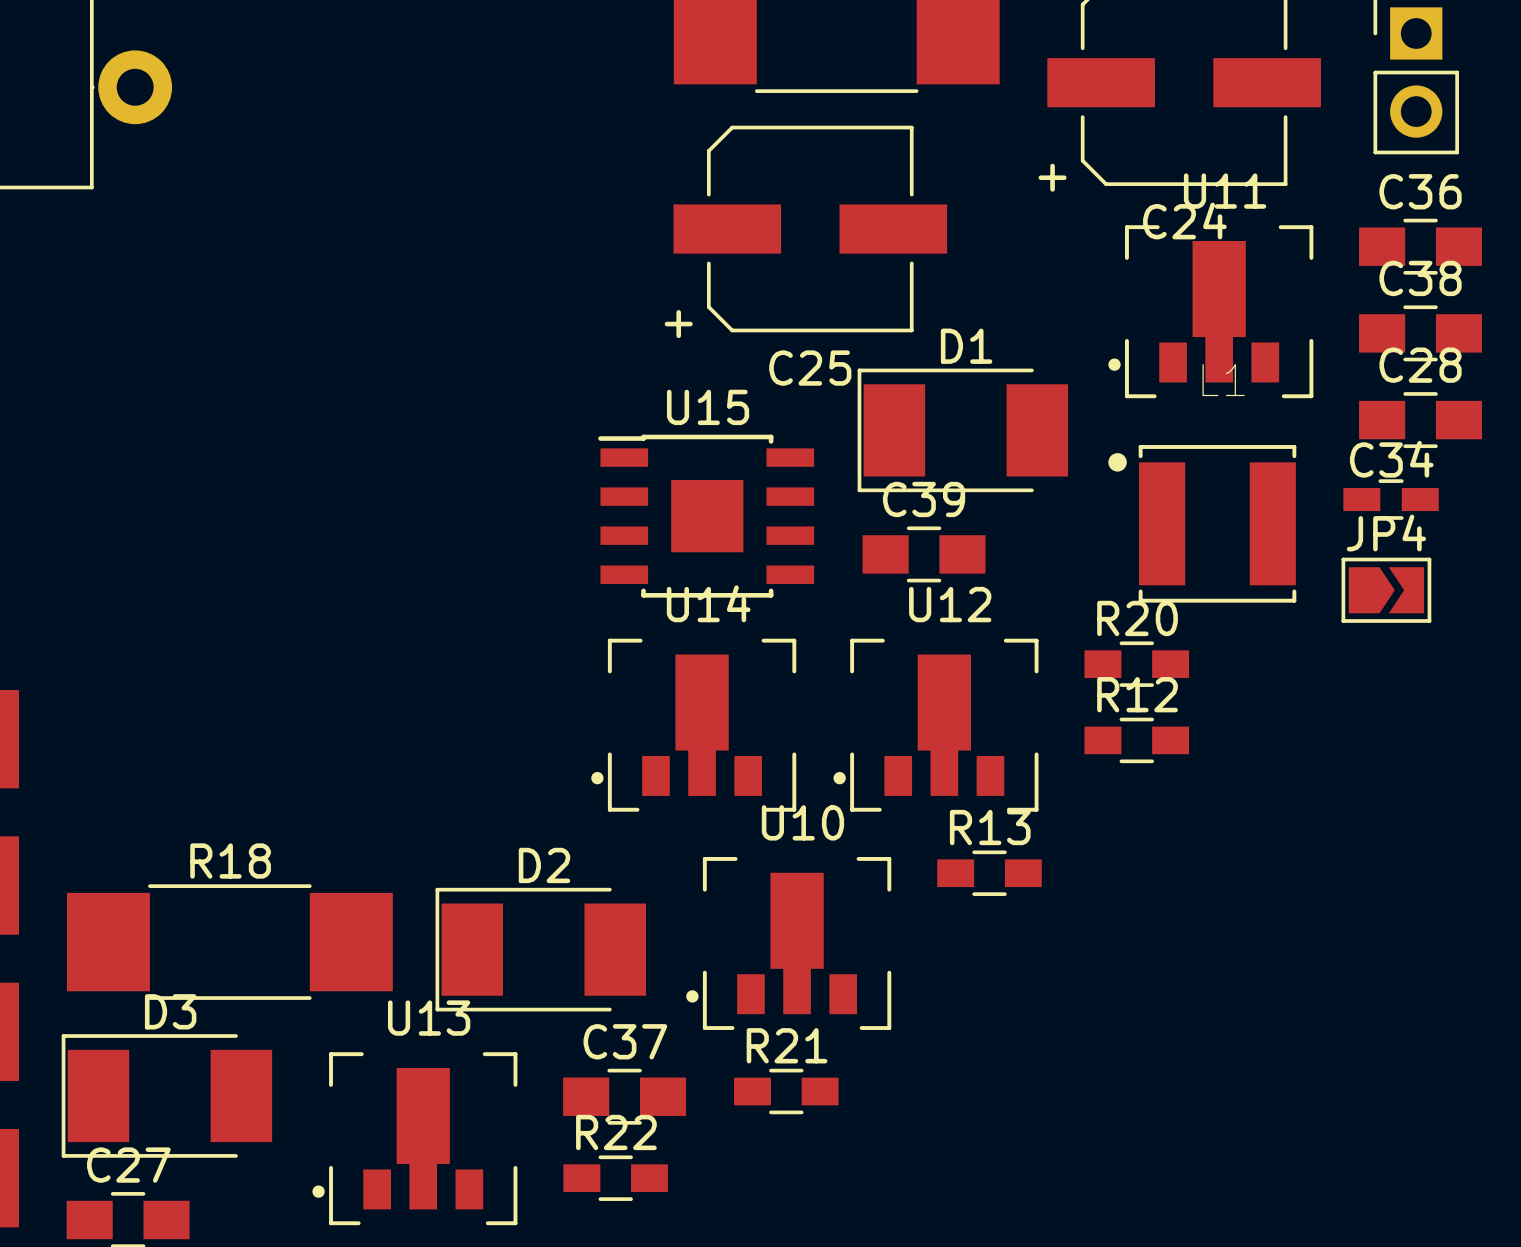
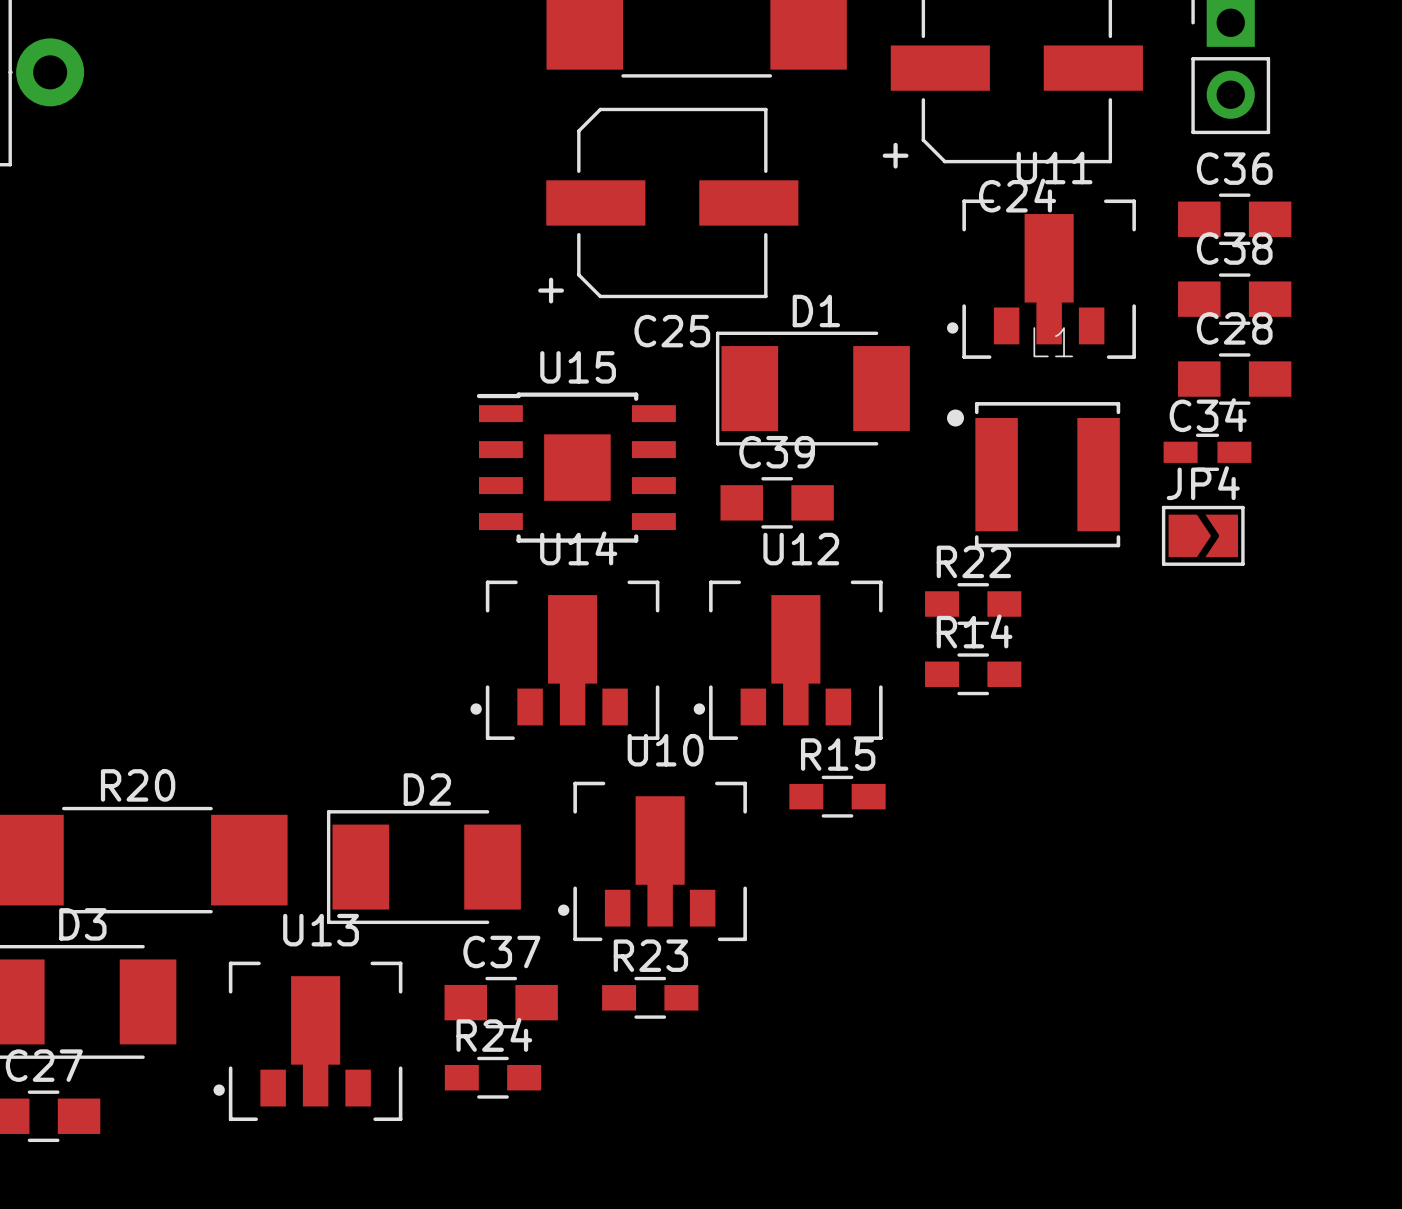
R20 name: R20 (1137, 618) -> R22 (973, 561)
R12 name: R12 (1137, 694) -> R14 (974, 631)
R13 name: R13 (990, 827) -> R15 (838, 754)
R18 name: R18 (230, 861) -> R20 (138, 785)
R21 name: R21 (787, 1045) -> R23 (650, 955)
R22 name: R22 (616, 1132) -> R24 (494, 1034)

